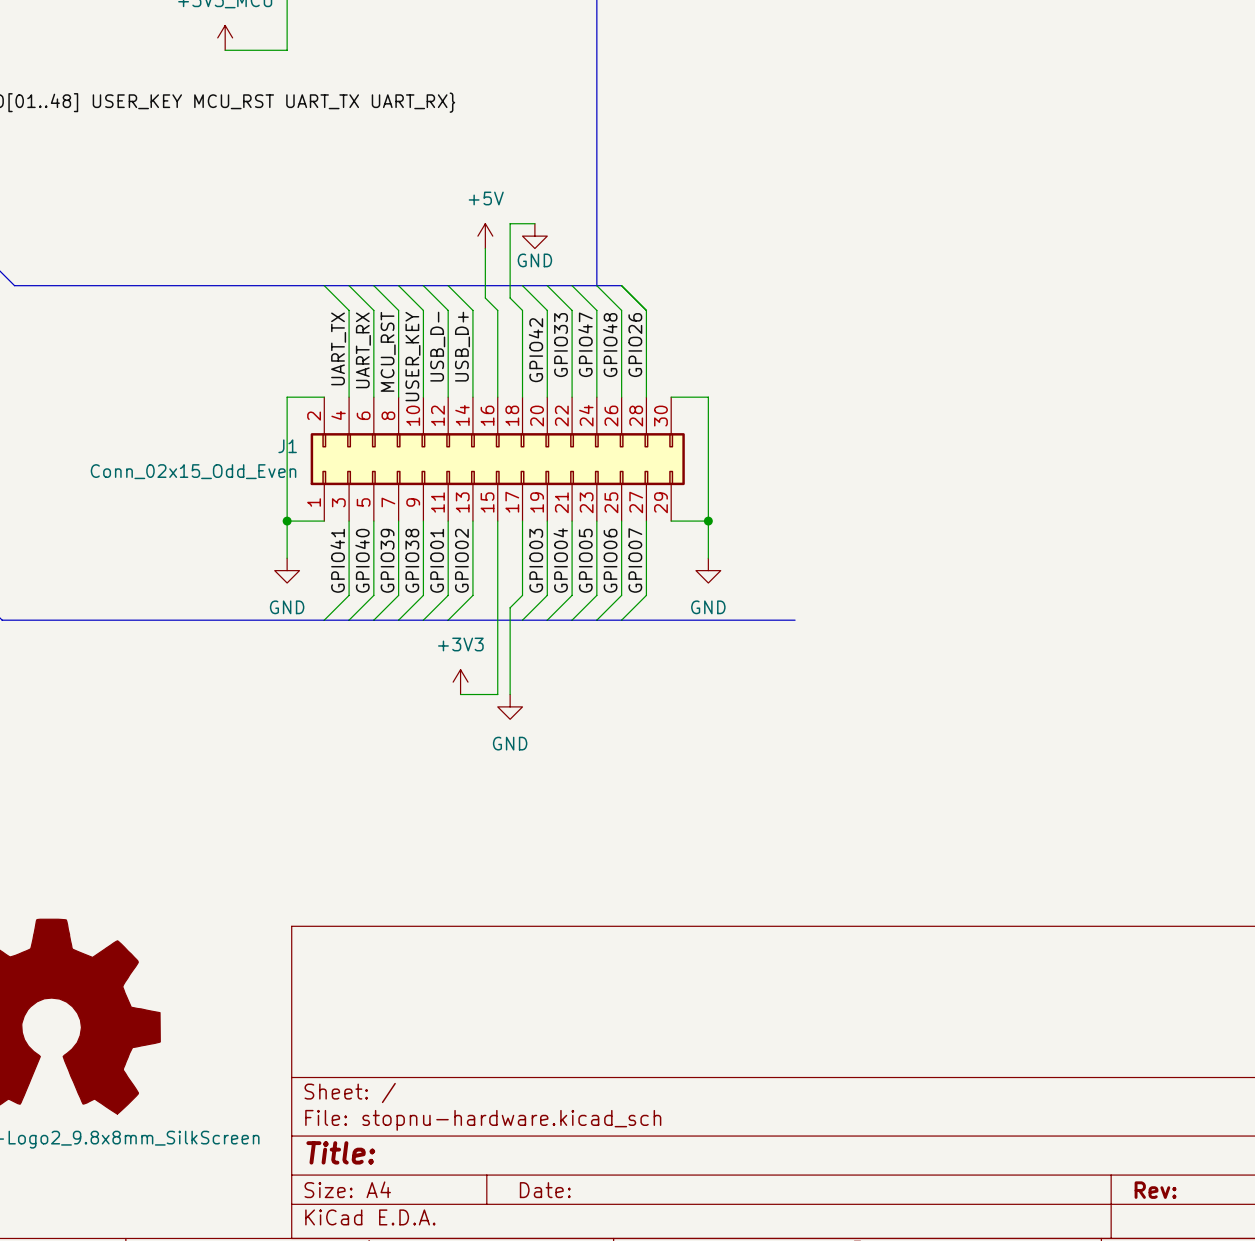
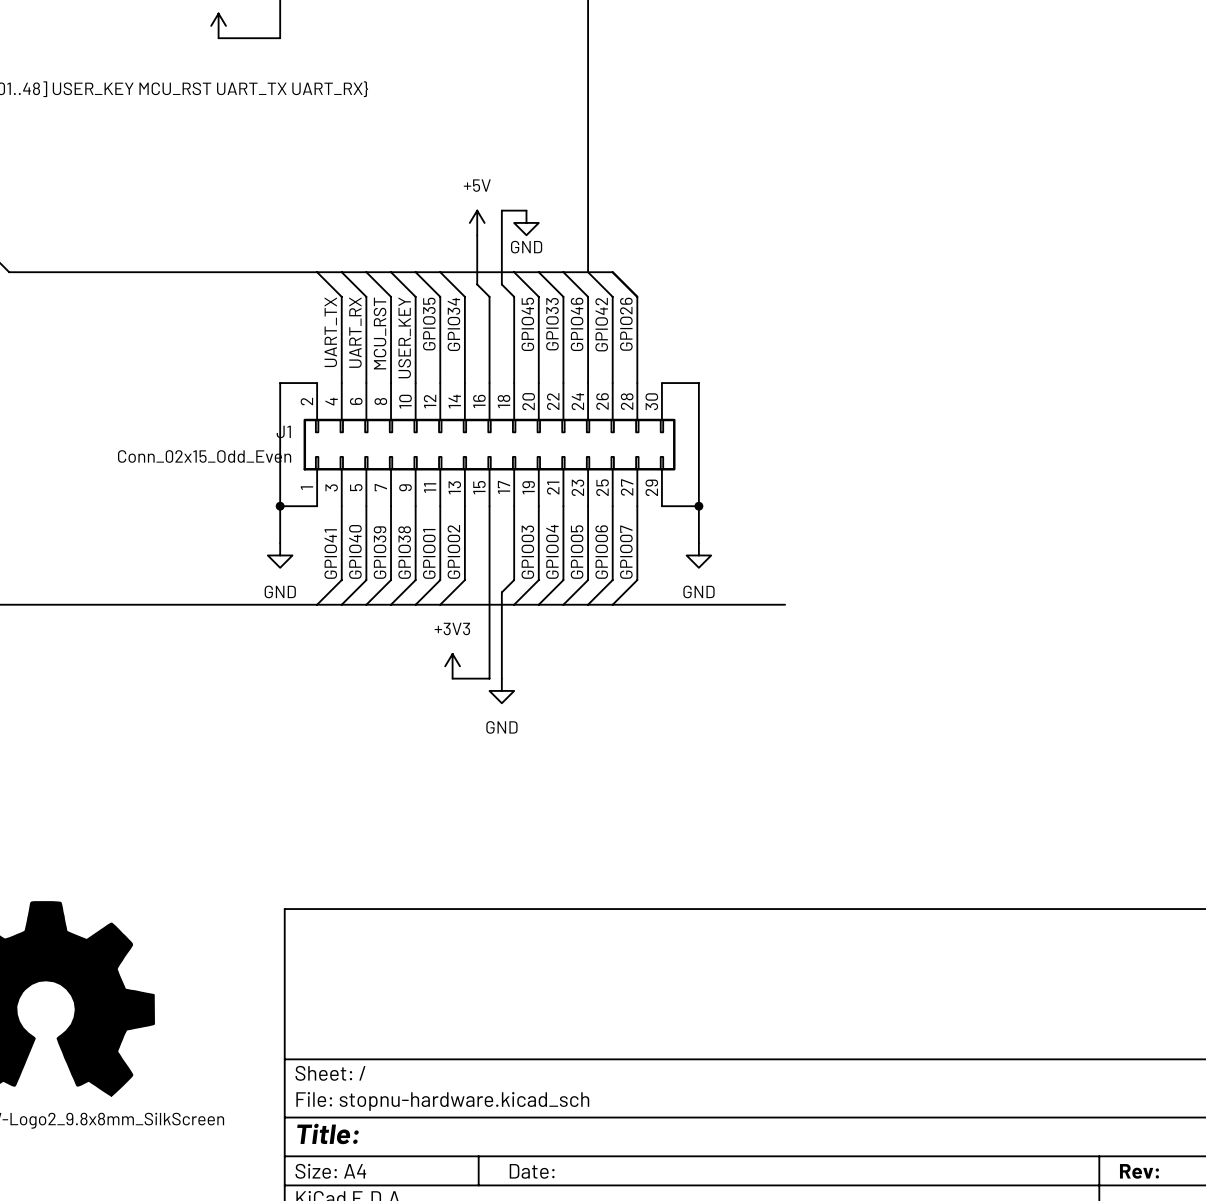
label: none -> GPIO34 (453, 324)
label: GPIO47 (585, 344) -> GPIO46 (577, 324)
label: none -> GPIO35 (429, 324)
label: GPIO48 (610, 345) -> GPIO42 (601, 324)
label: USB_D- (437, 346) -> none
label: USB_D+ (462, 346) -> none
label: GPIO42 (535, 350) -> GPIO45 (527, 324)

